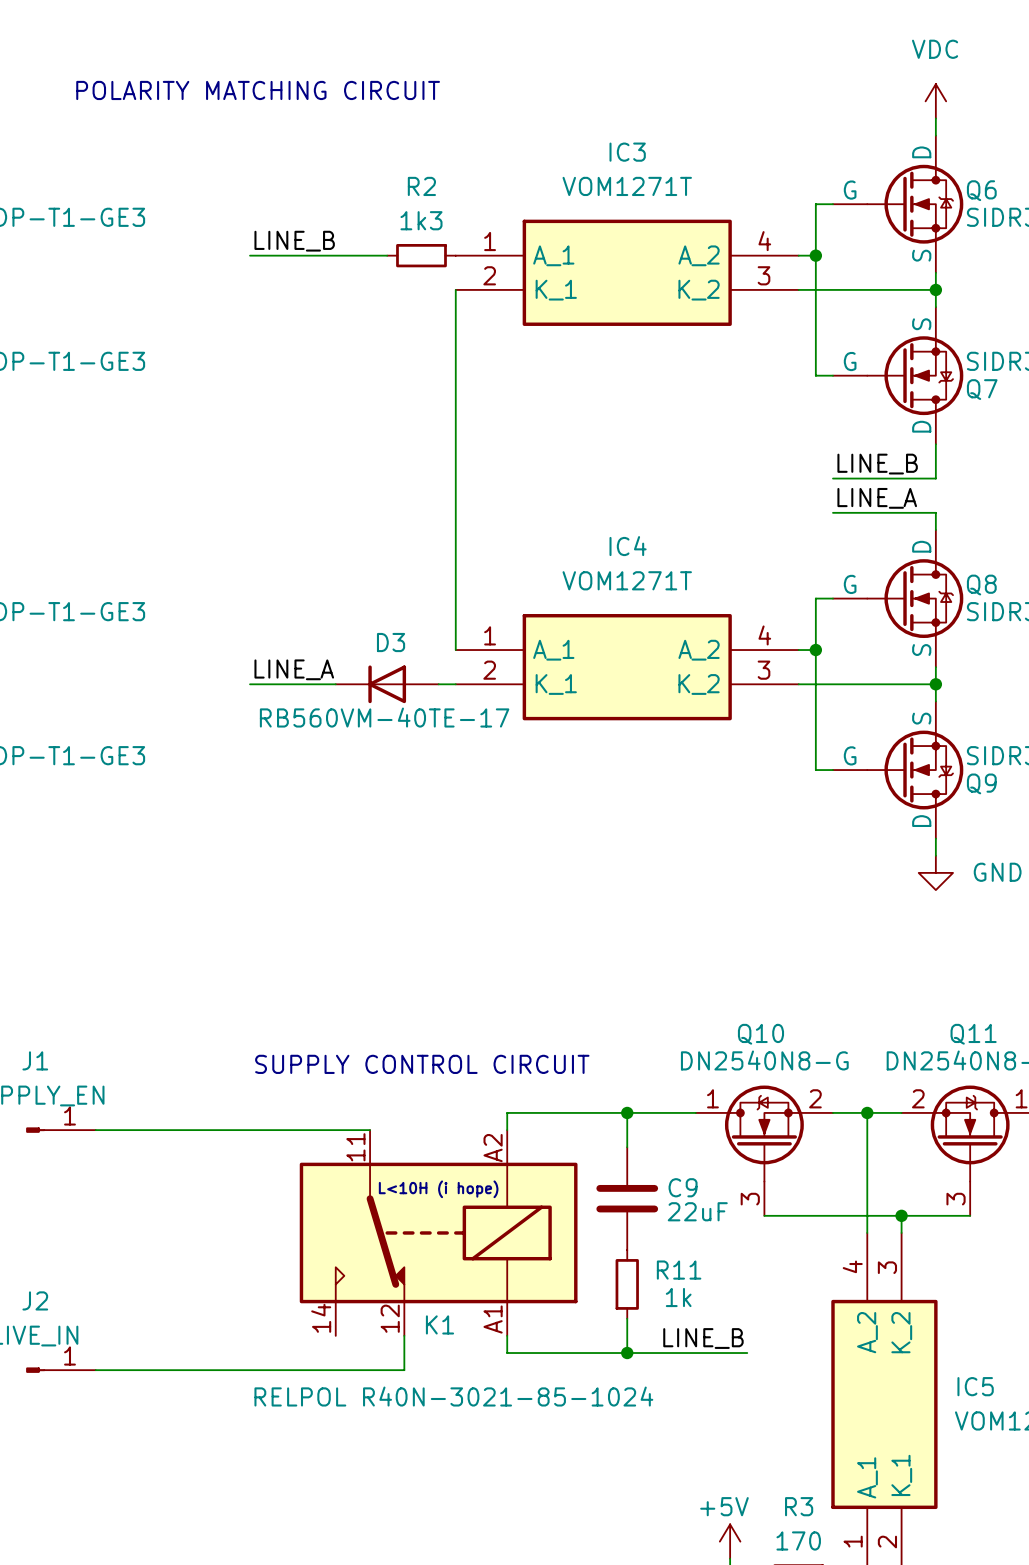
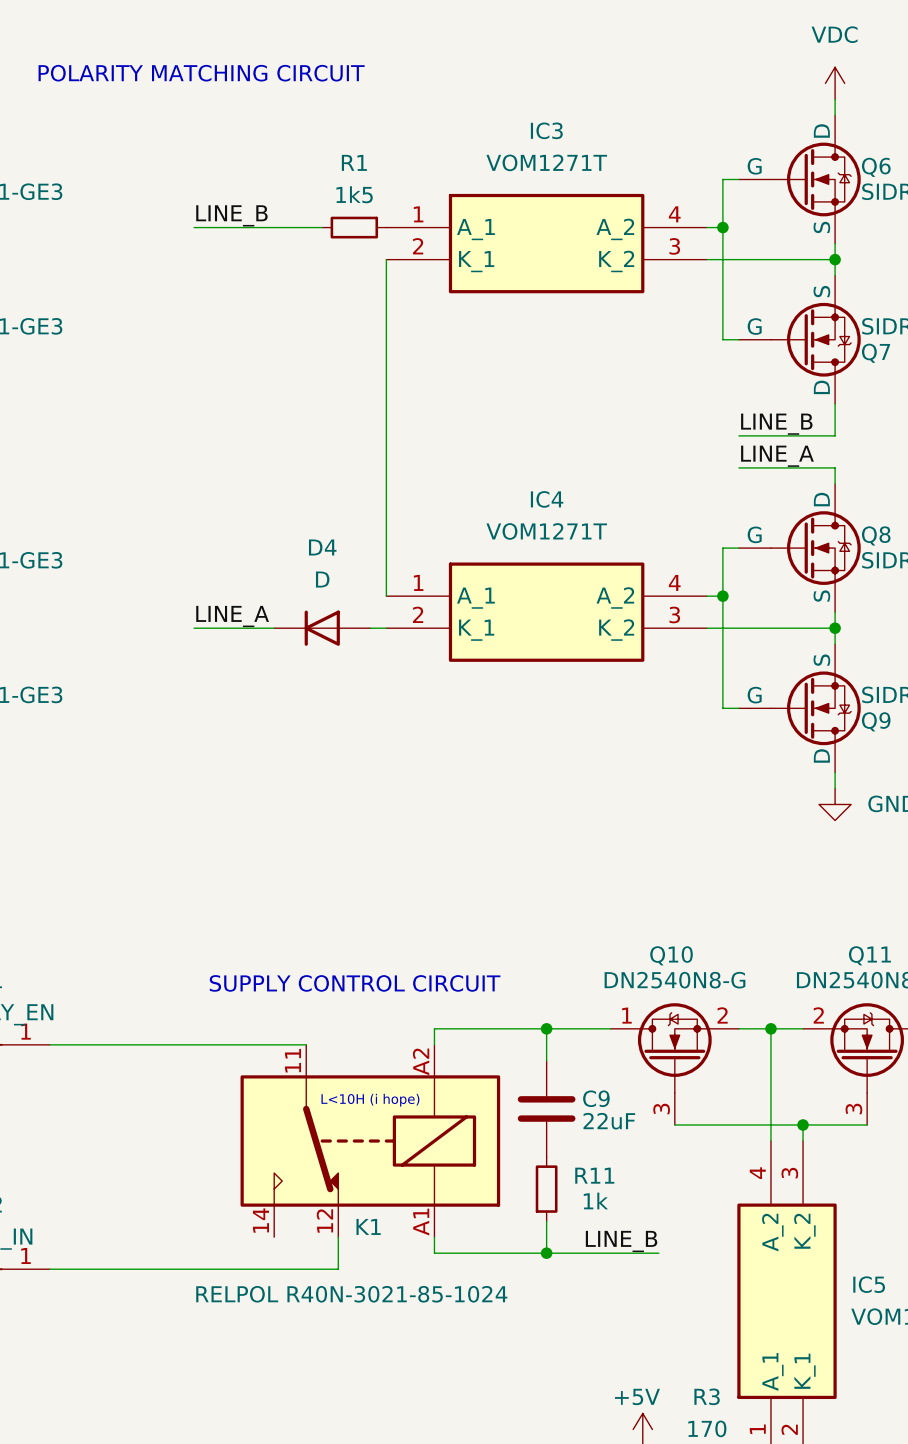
R2 name: R2 (421, 186) -> R1 (354, 162)
R2 value: 1k3 (421, 220) -> 1k5 (354, 194)
D3 name: D3 (391, 642) -> D4 (322, 547)
D3 value: RB560VM-40TE-17 (384, 717) -> D (322, 579)

